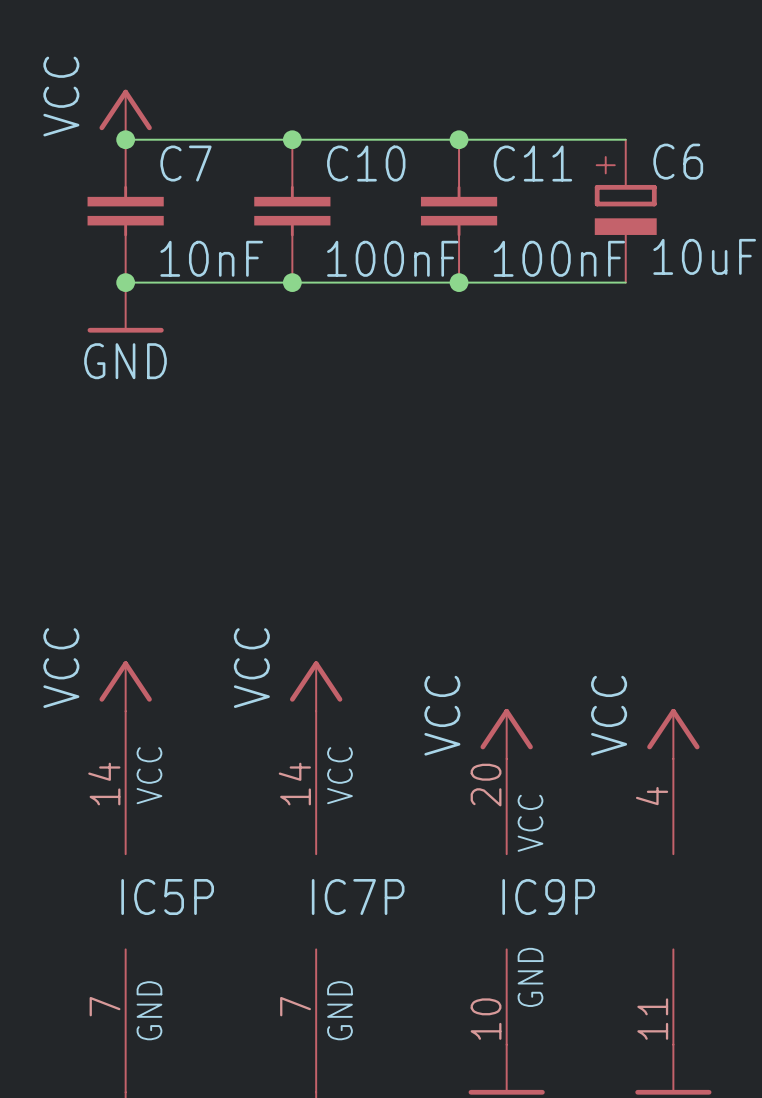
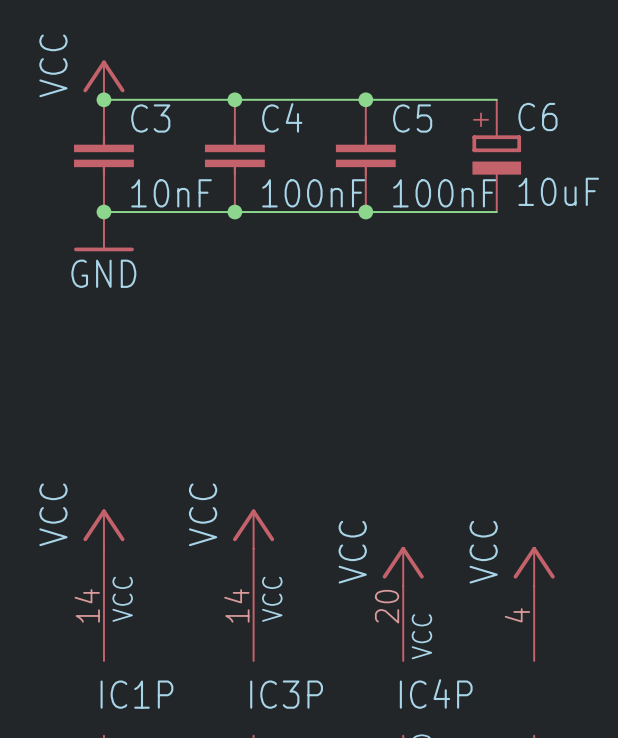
C7 name: C7 (185, 163) -> C3 (150, 118)
C10 name: C10 (366, 163) -> C4 (282, 117)
C11 name: C11 (532, 163) -> C5 (412, 118)
IC5P name: IC5P (167, 897) -> IC1P (136, 694)
IC7P name: IC7P (358, 897) -> IC3P (286, 694)
IC9P name: IC9P (548, 897) -> IC4P (436, 693)

